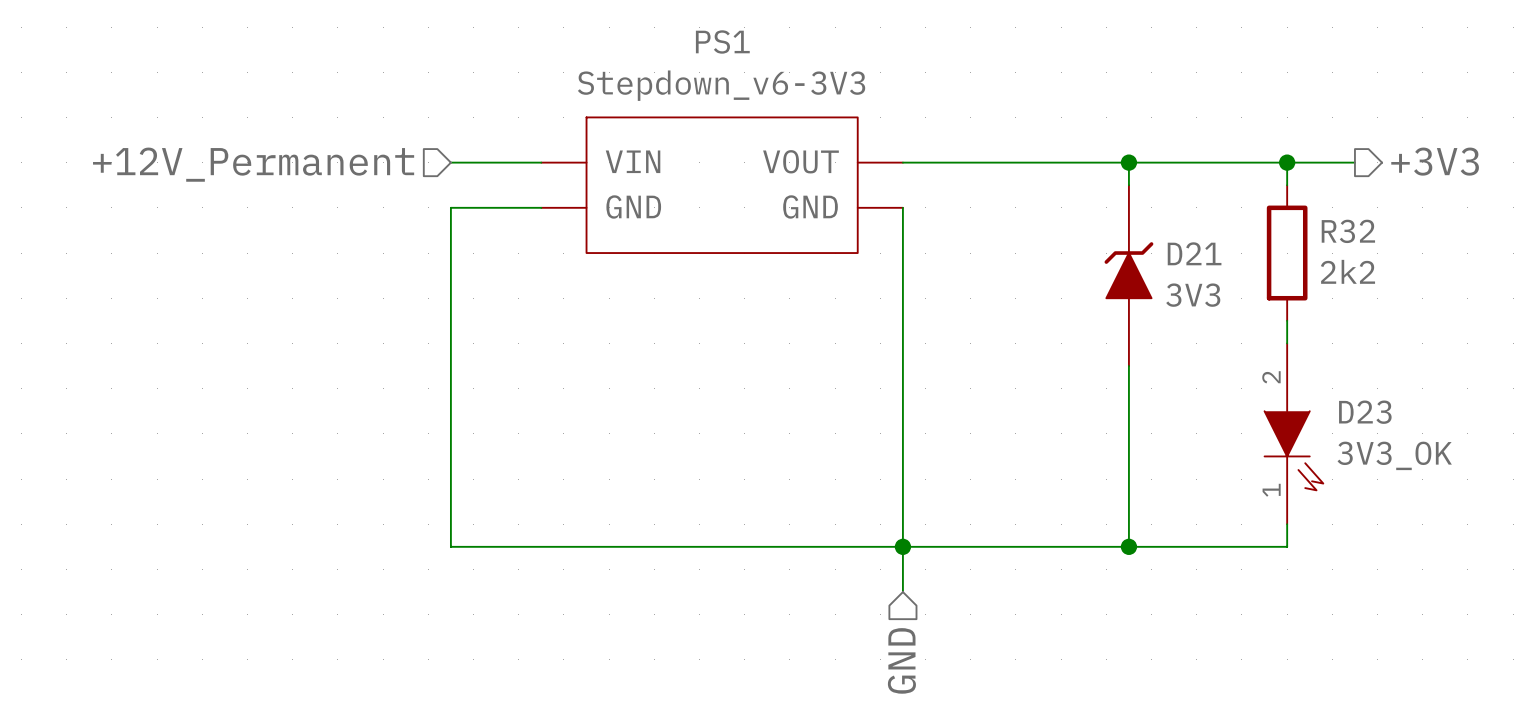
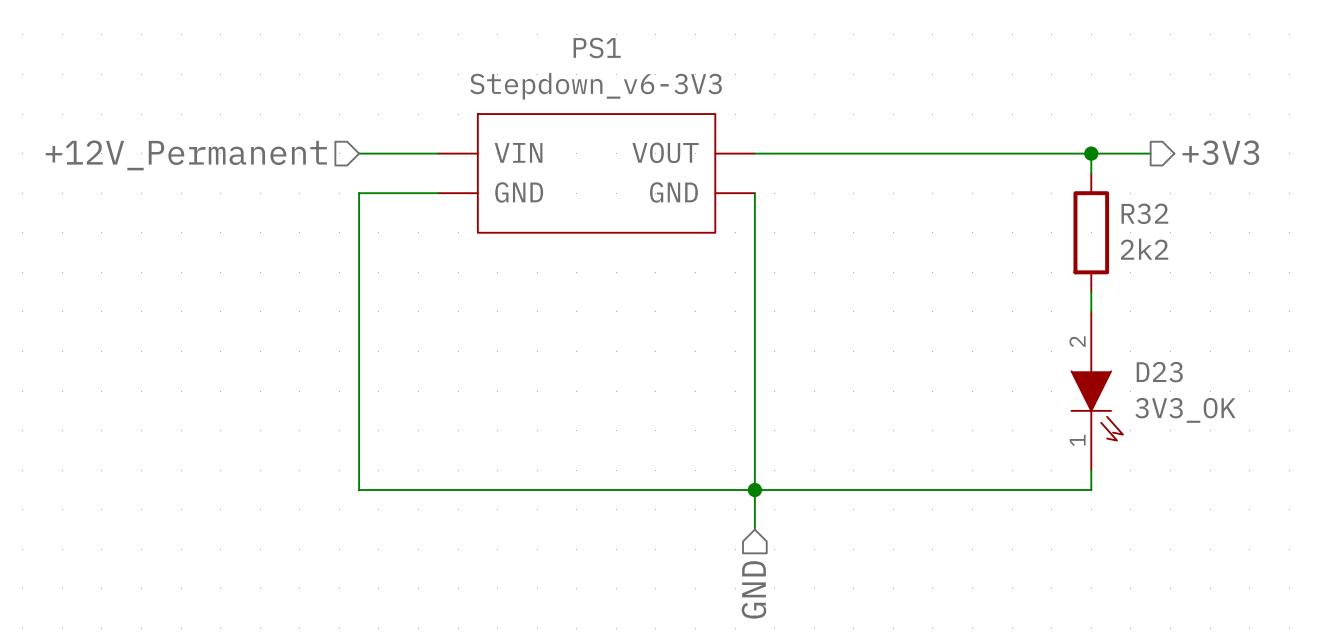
wire: (1128, 162) (1128, 185) -> none
junction: (1128, 162) -> none
D21: 3V3 (1128, 275) -> none
wire: (1128, 366) (1128, 546) -> none
junction: (1128, 546) -> none

